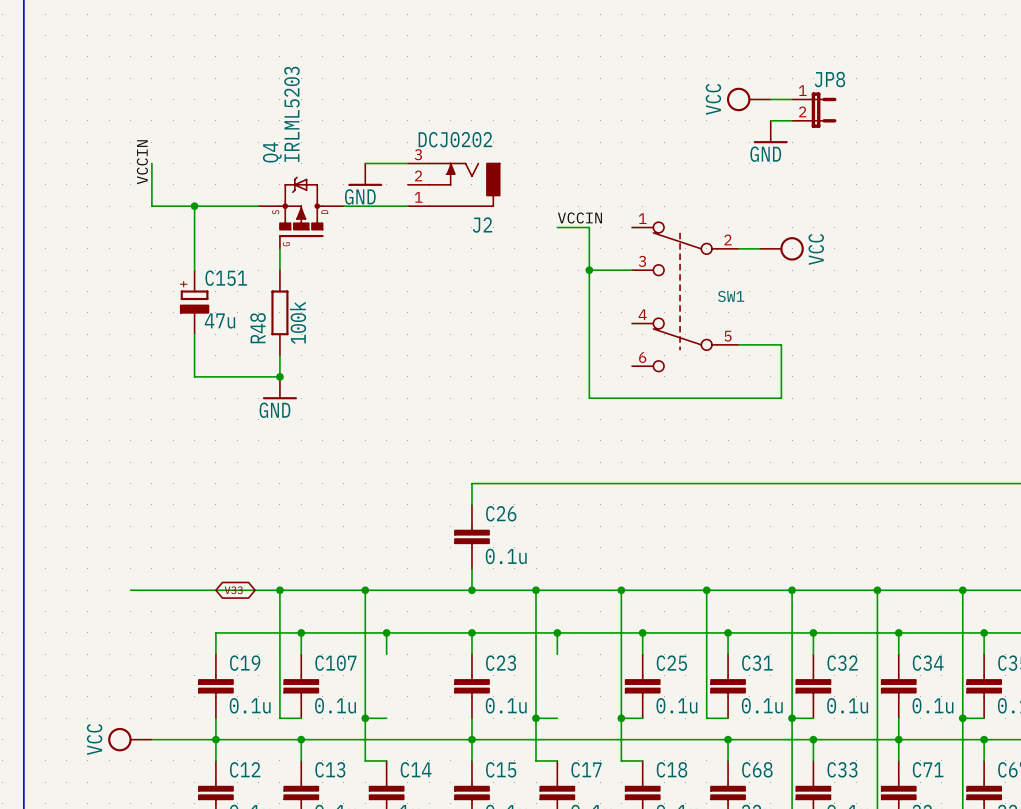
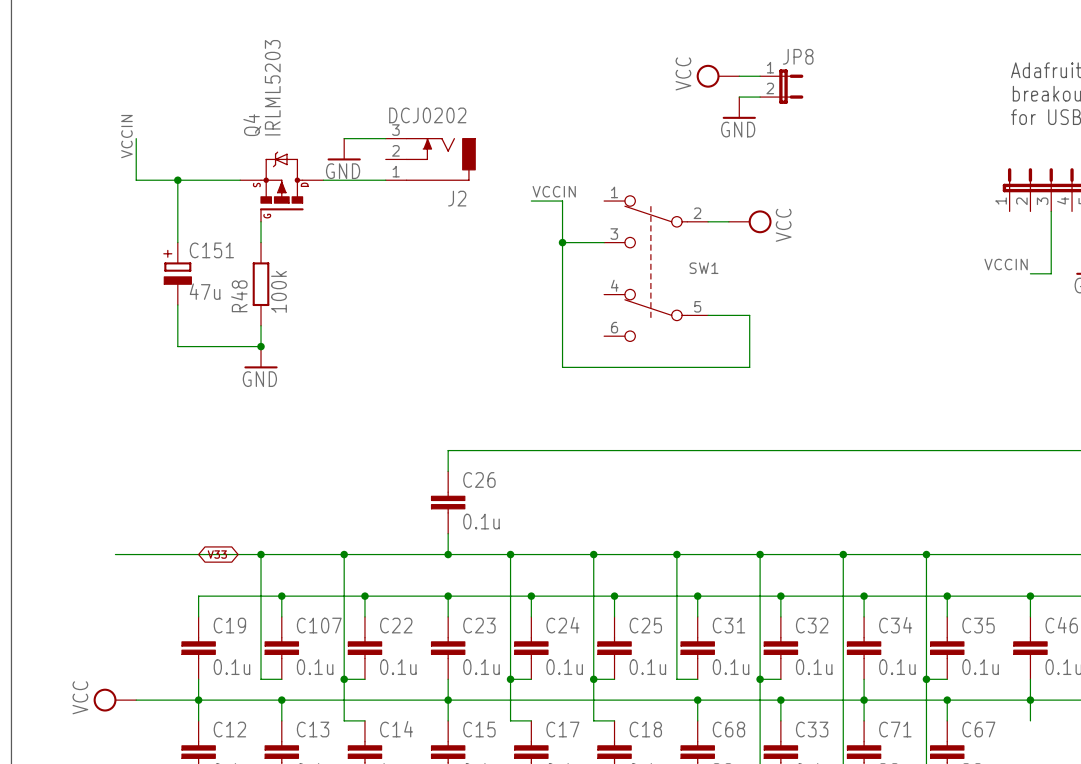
C22: none -> 0.1u (364, 648)
C24: none -> 0.1u (531, 648)

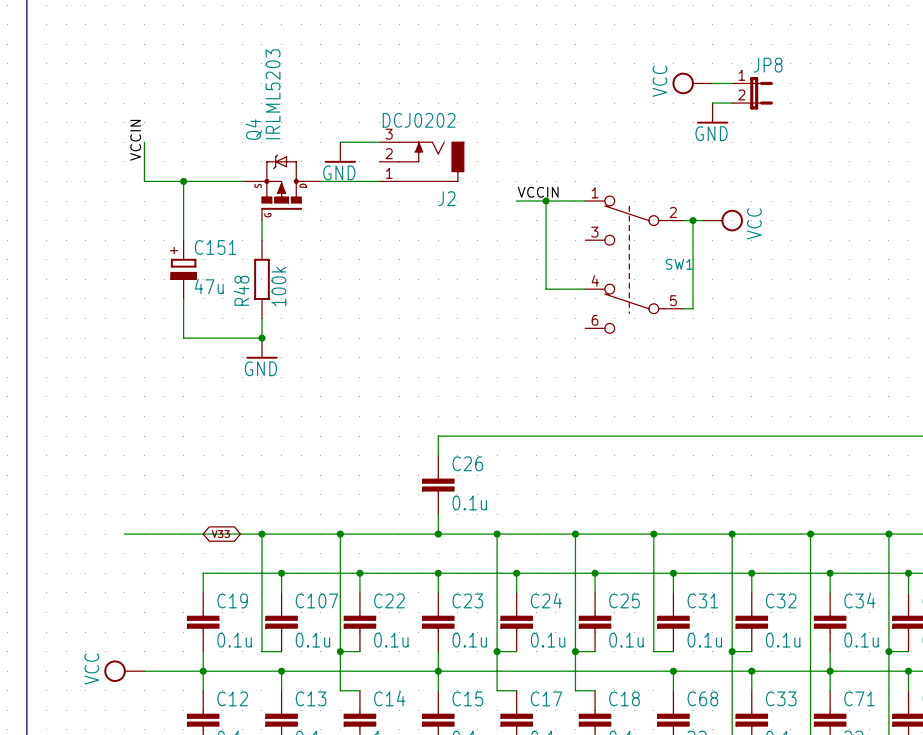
wire: none -> (693, 220) (693, 308)
junction: none -> (693, 220)
wire: (562, 242) (604, 242) -> (546, 201) (585, 201)
junction position: (562, 242) -> (546, 201)
wire: (562, 294) (562, 367) (749, 367) (749, 315) (718, 315) -> (546, 289) (585, 289)

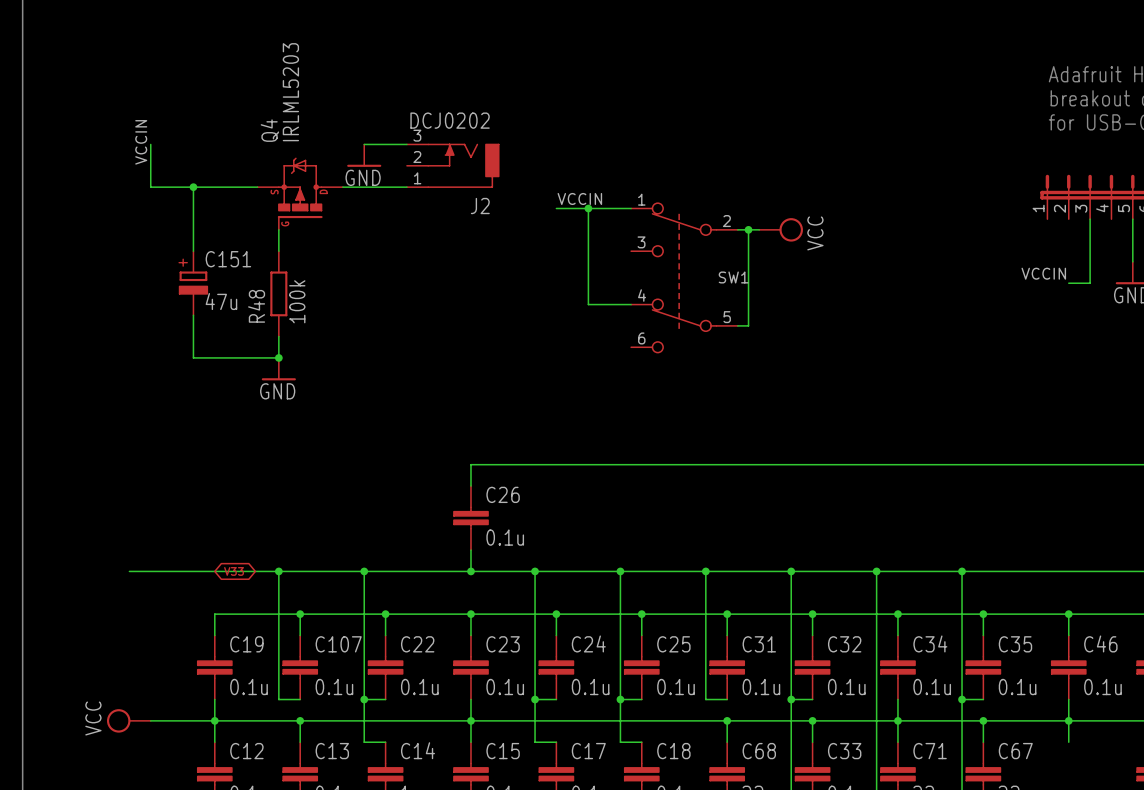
power symbol: VCC (692, 83) -> none
wire: (712, 83) (732, 83) -> none
JP8: (752, 93) -> none
wire: (712, 103) (732, 103) -> none
power symbol: GND (712, 113) -> none

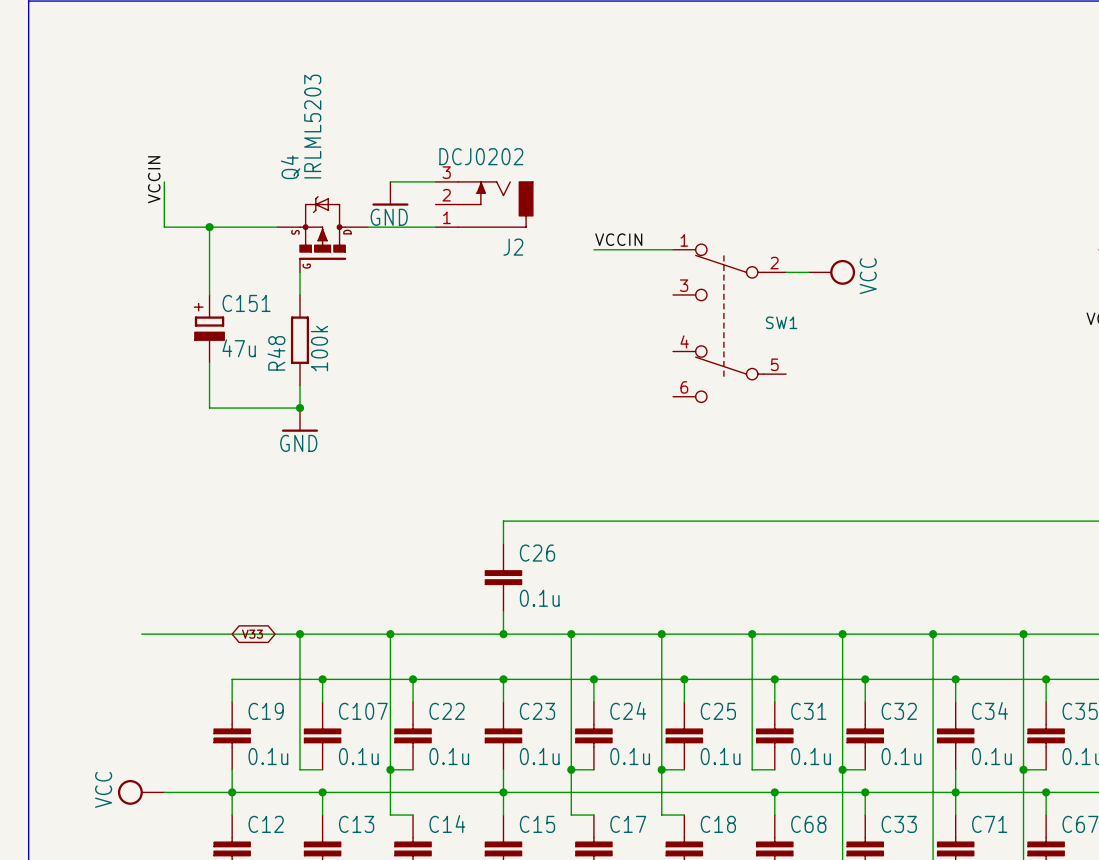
wire: (588, 208) (588, 304) (631, 304) -> none
junction: (588, 208) -> none
wire: (748, 229) (748, 325) (737, 325) -> none
junction: (748, 229) -> none

